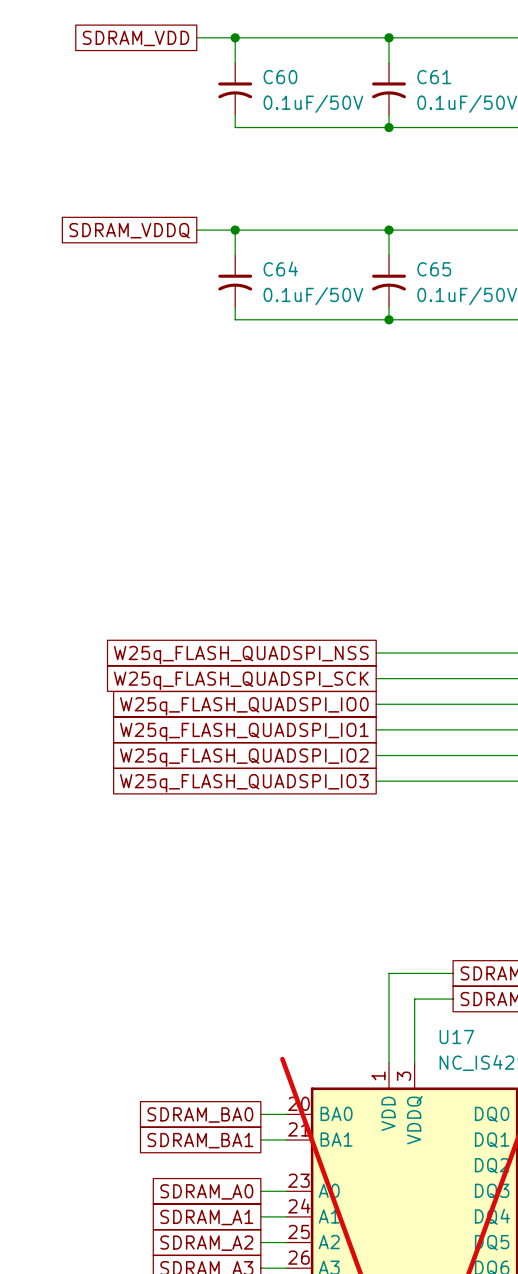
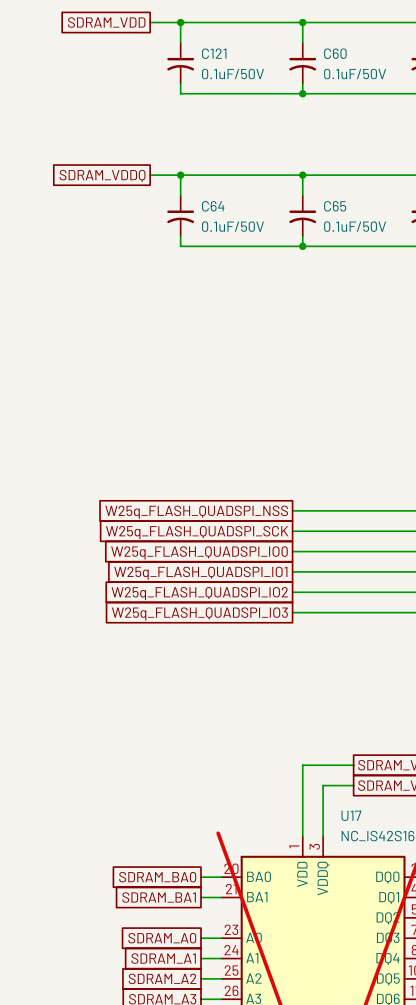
C60 name: C60 (280, 77) -> C121 (214, 53)
C61 name: C61 (434, 77) -> C60 (335, 53)

